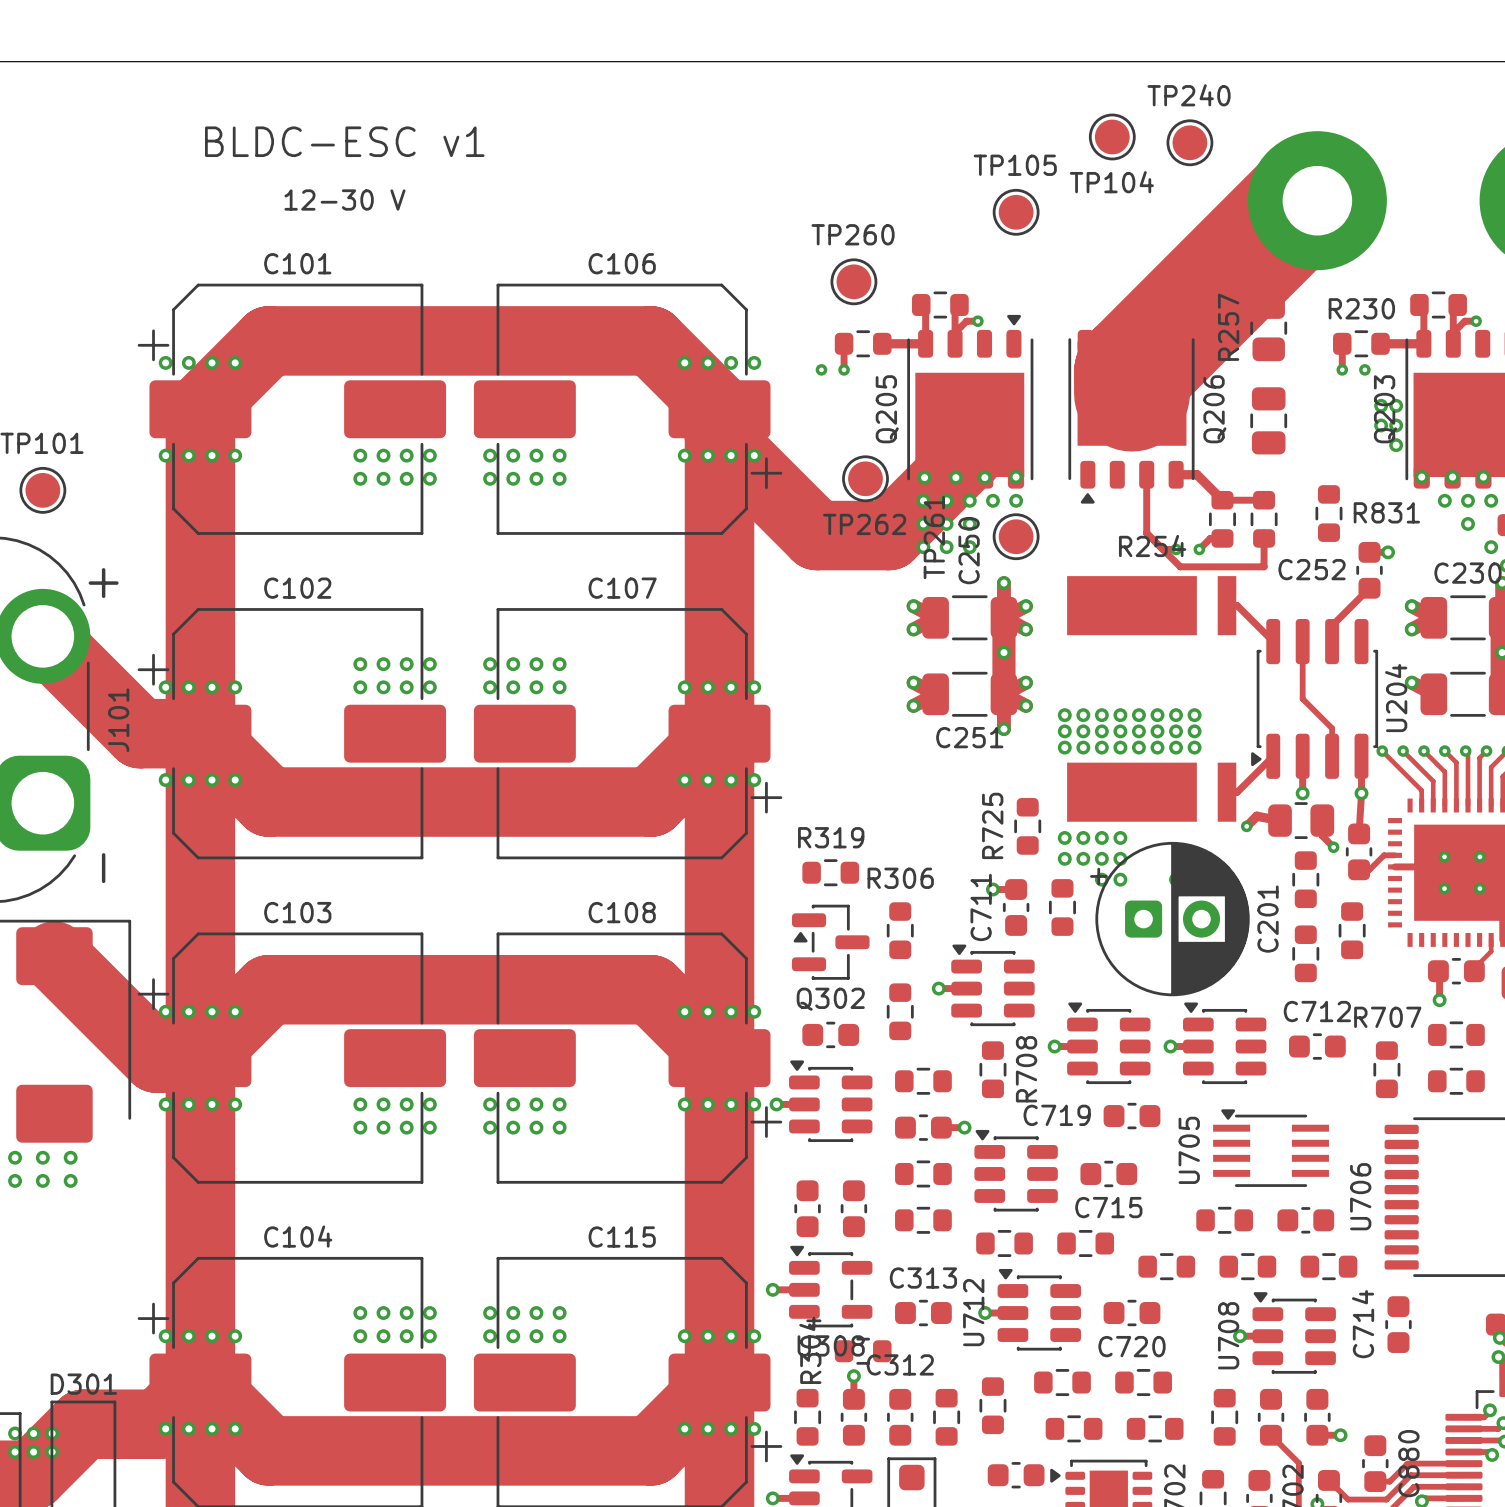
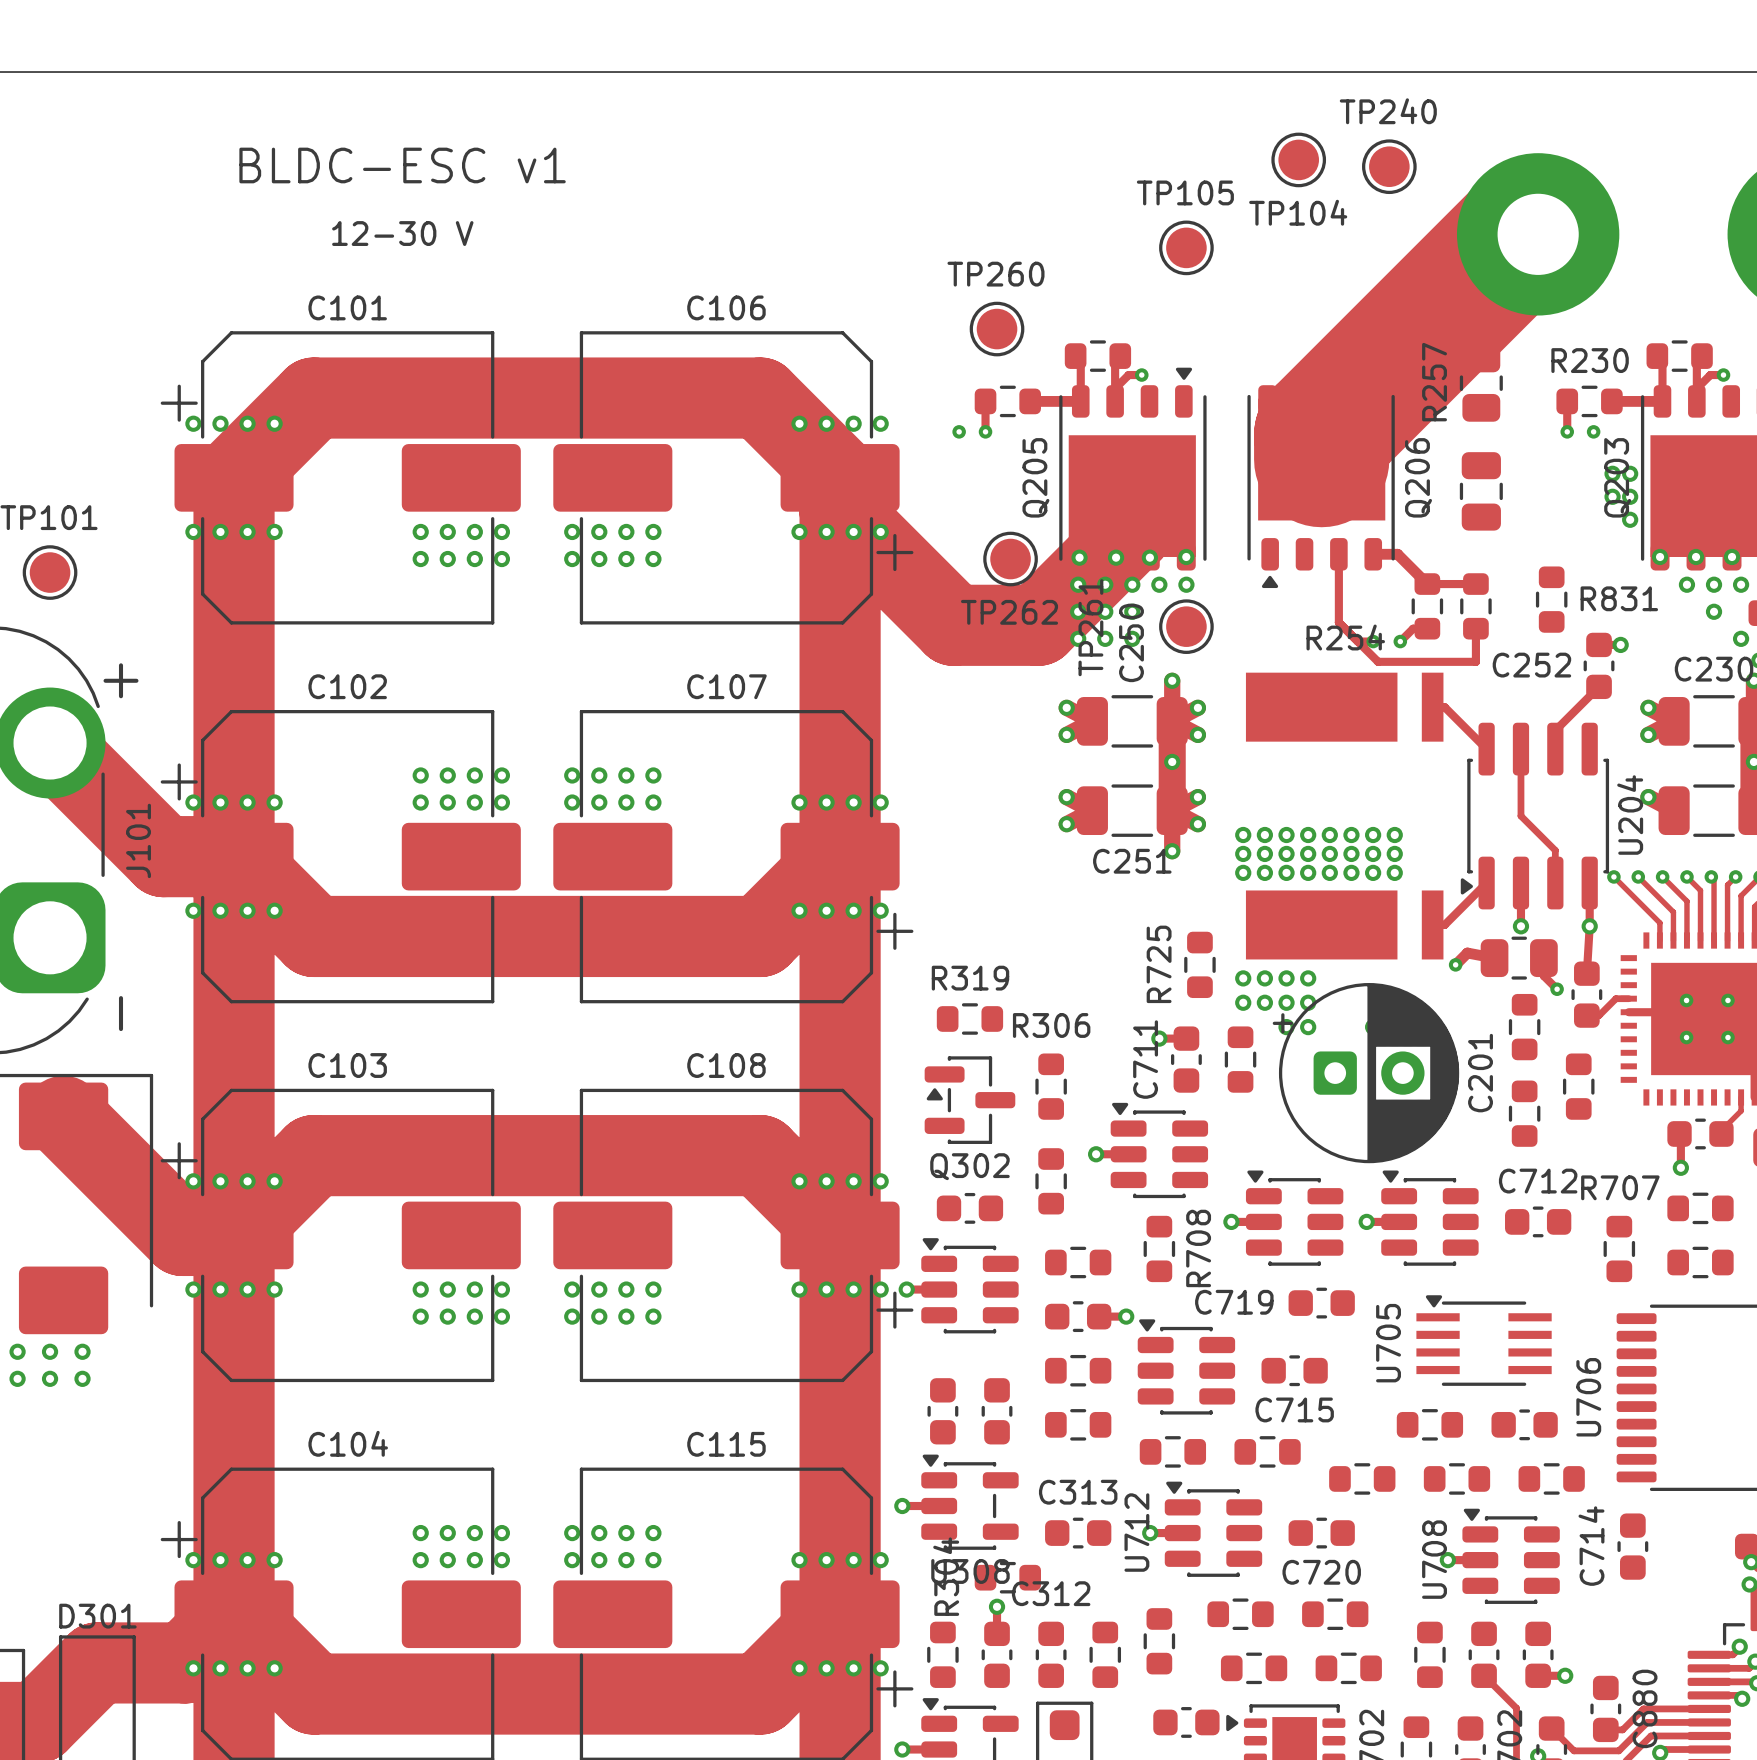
via: (15, 1433) -> none
via: (33, 1433) -> none
via: (52, 1433) -> none
via: (15, 1452) -> none
via: (33, 1452) -> none
via: (52, 1452) -> none

